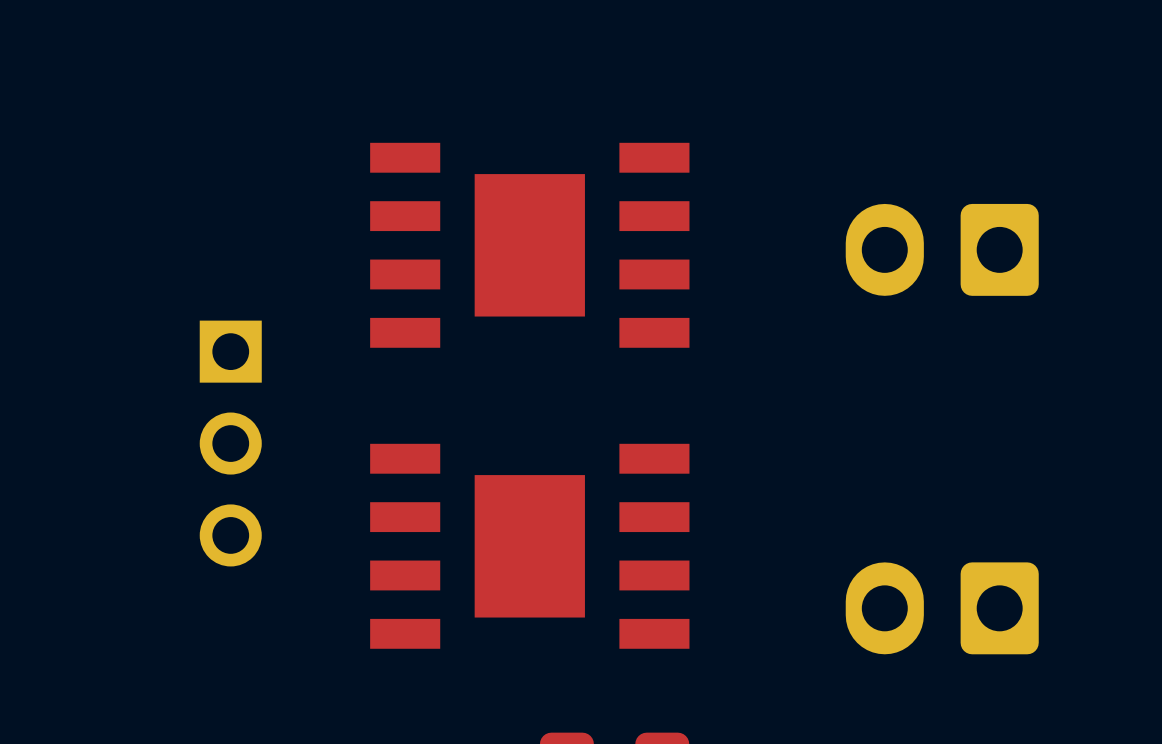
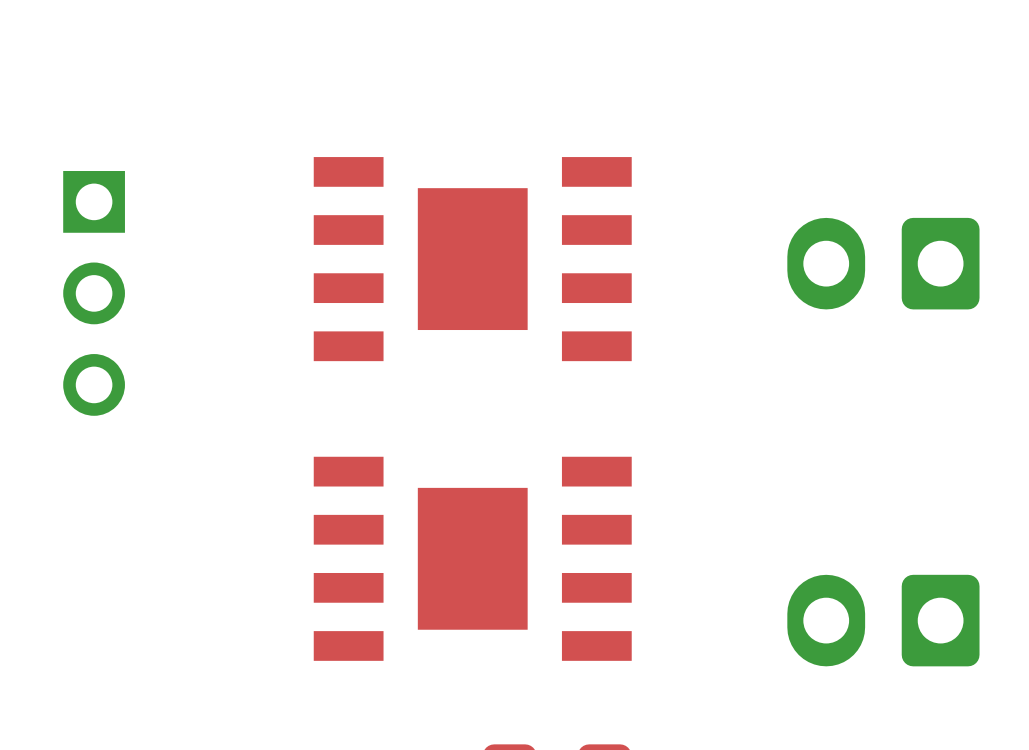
part position: (230, 443) -> (94, 293)

